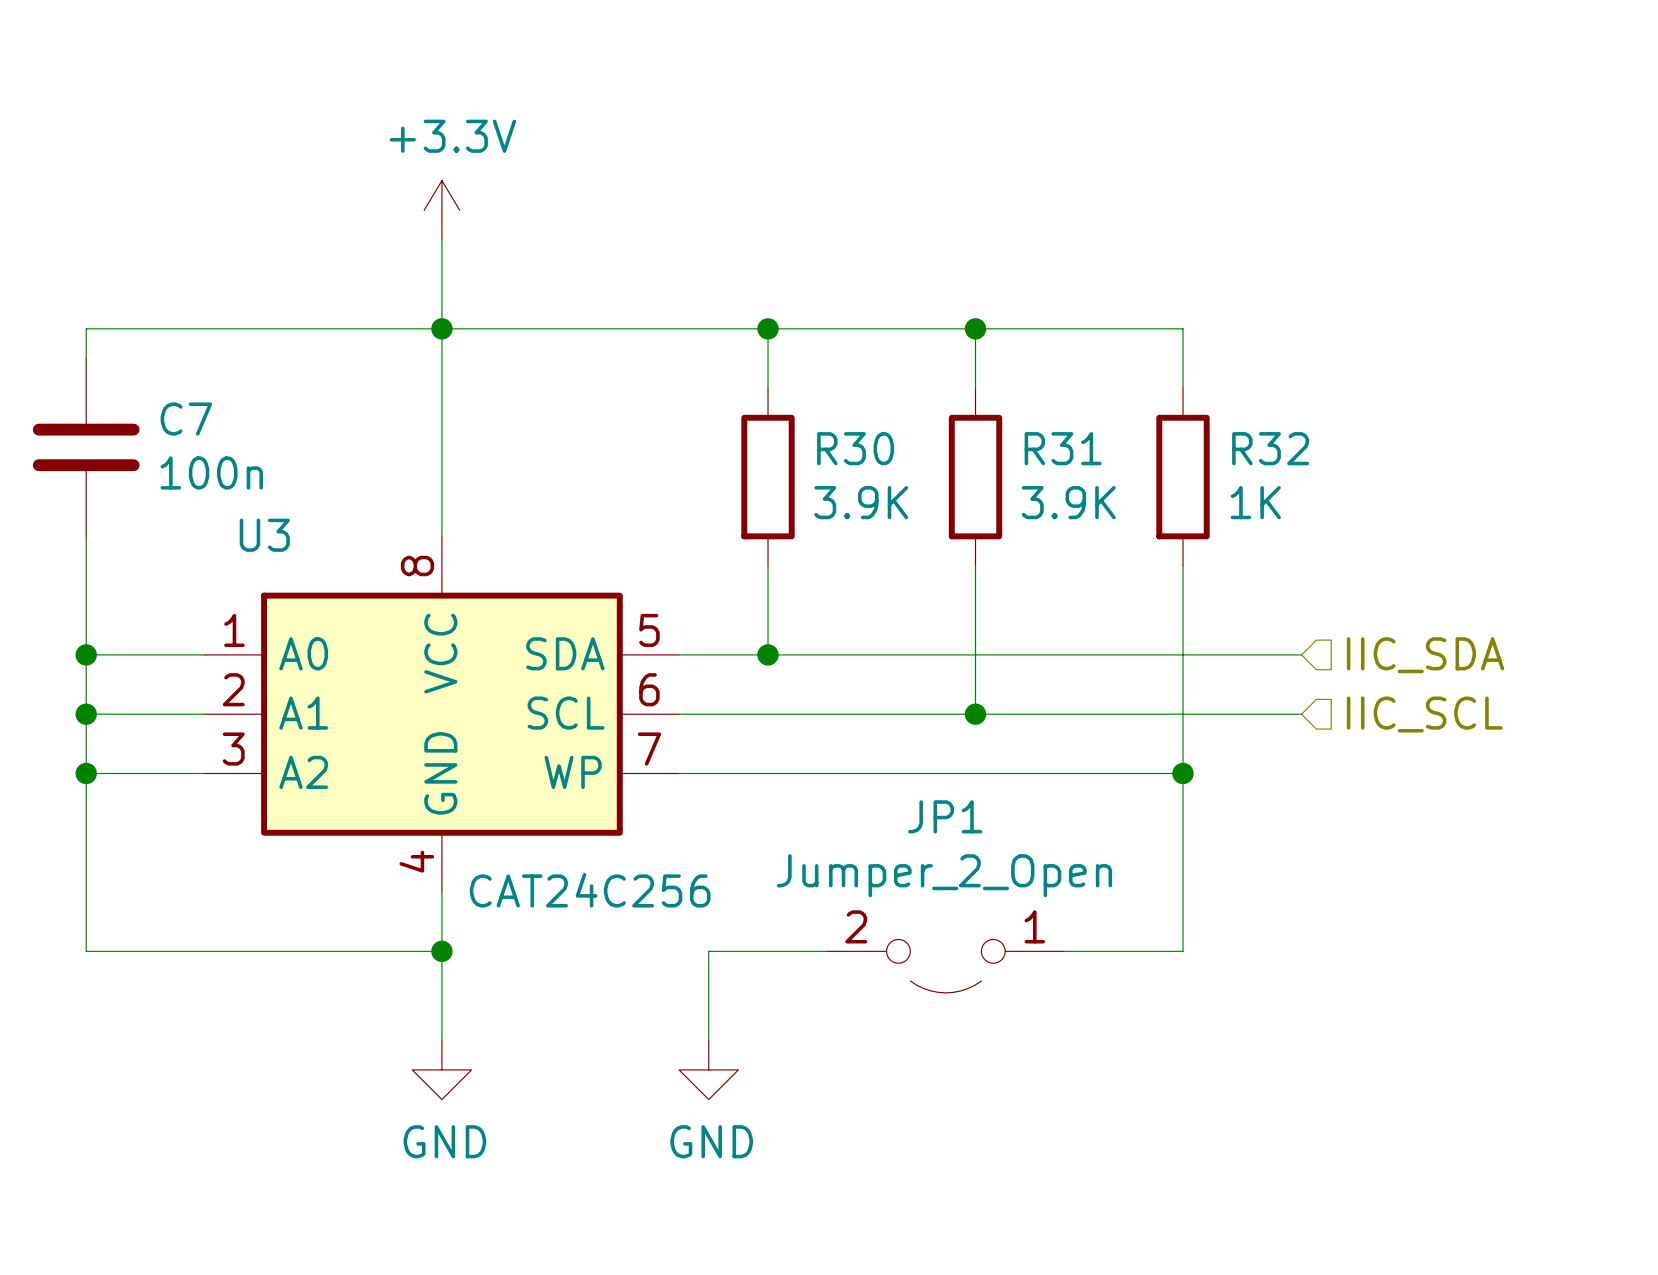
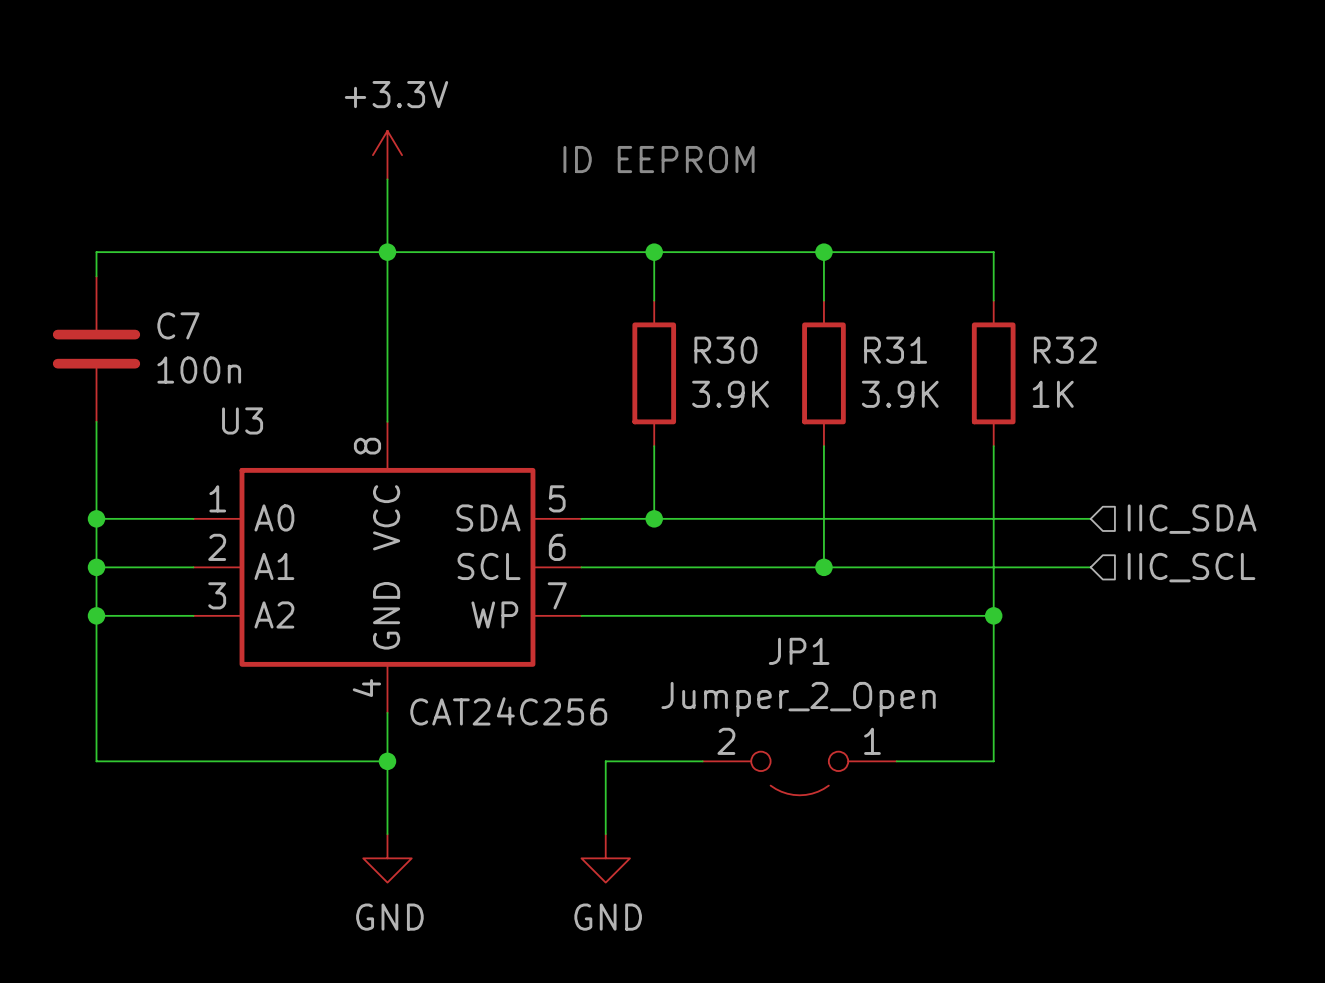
text: none -> ID EEPROM (659, 159)

